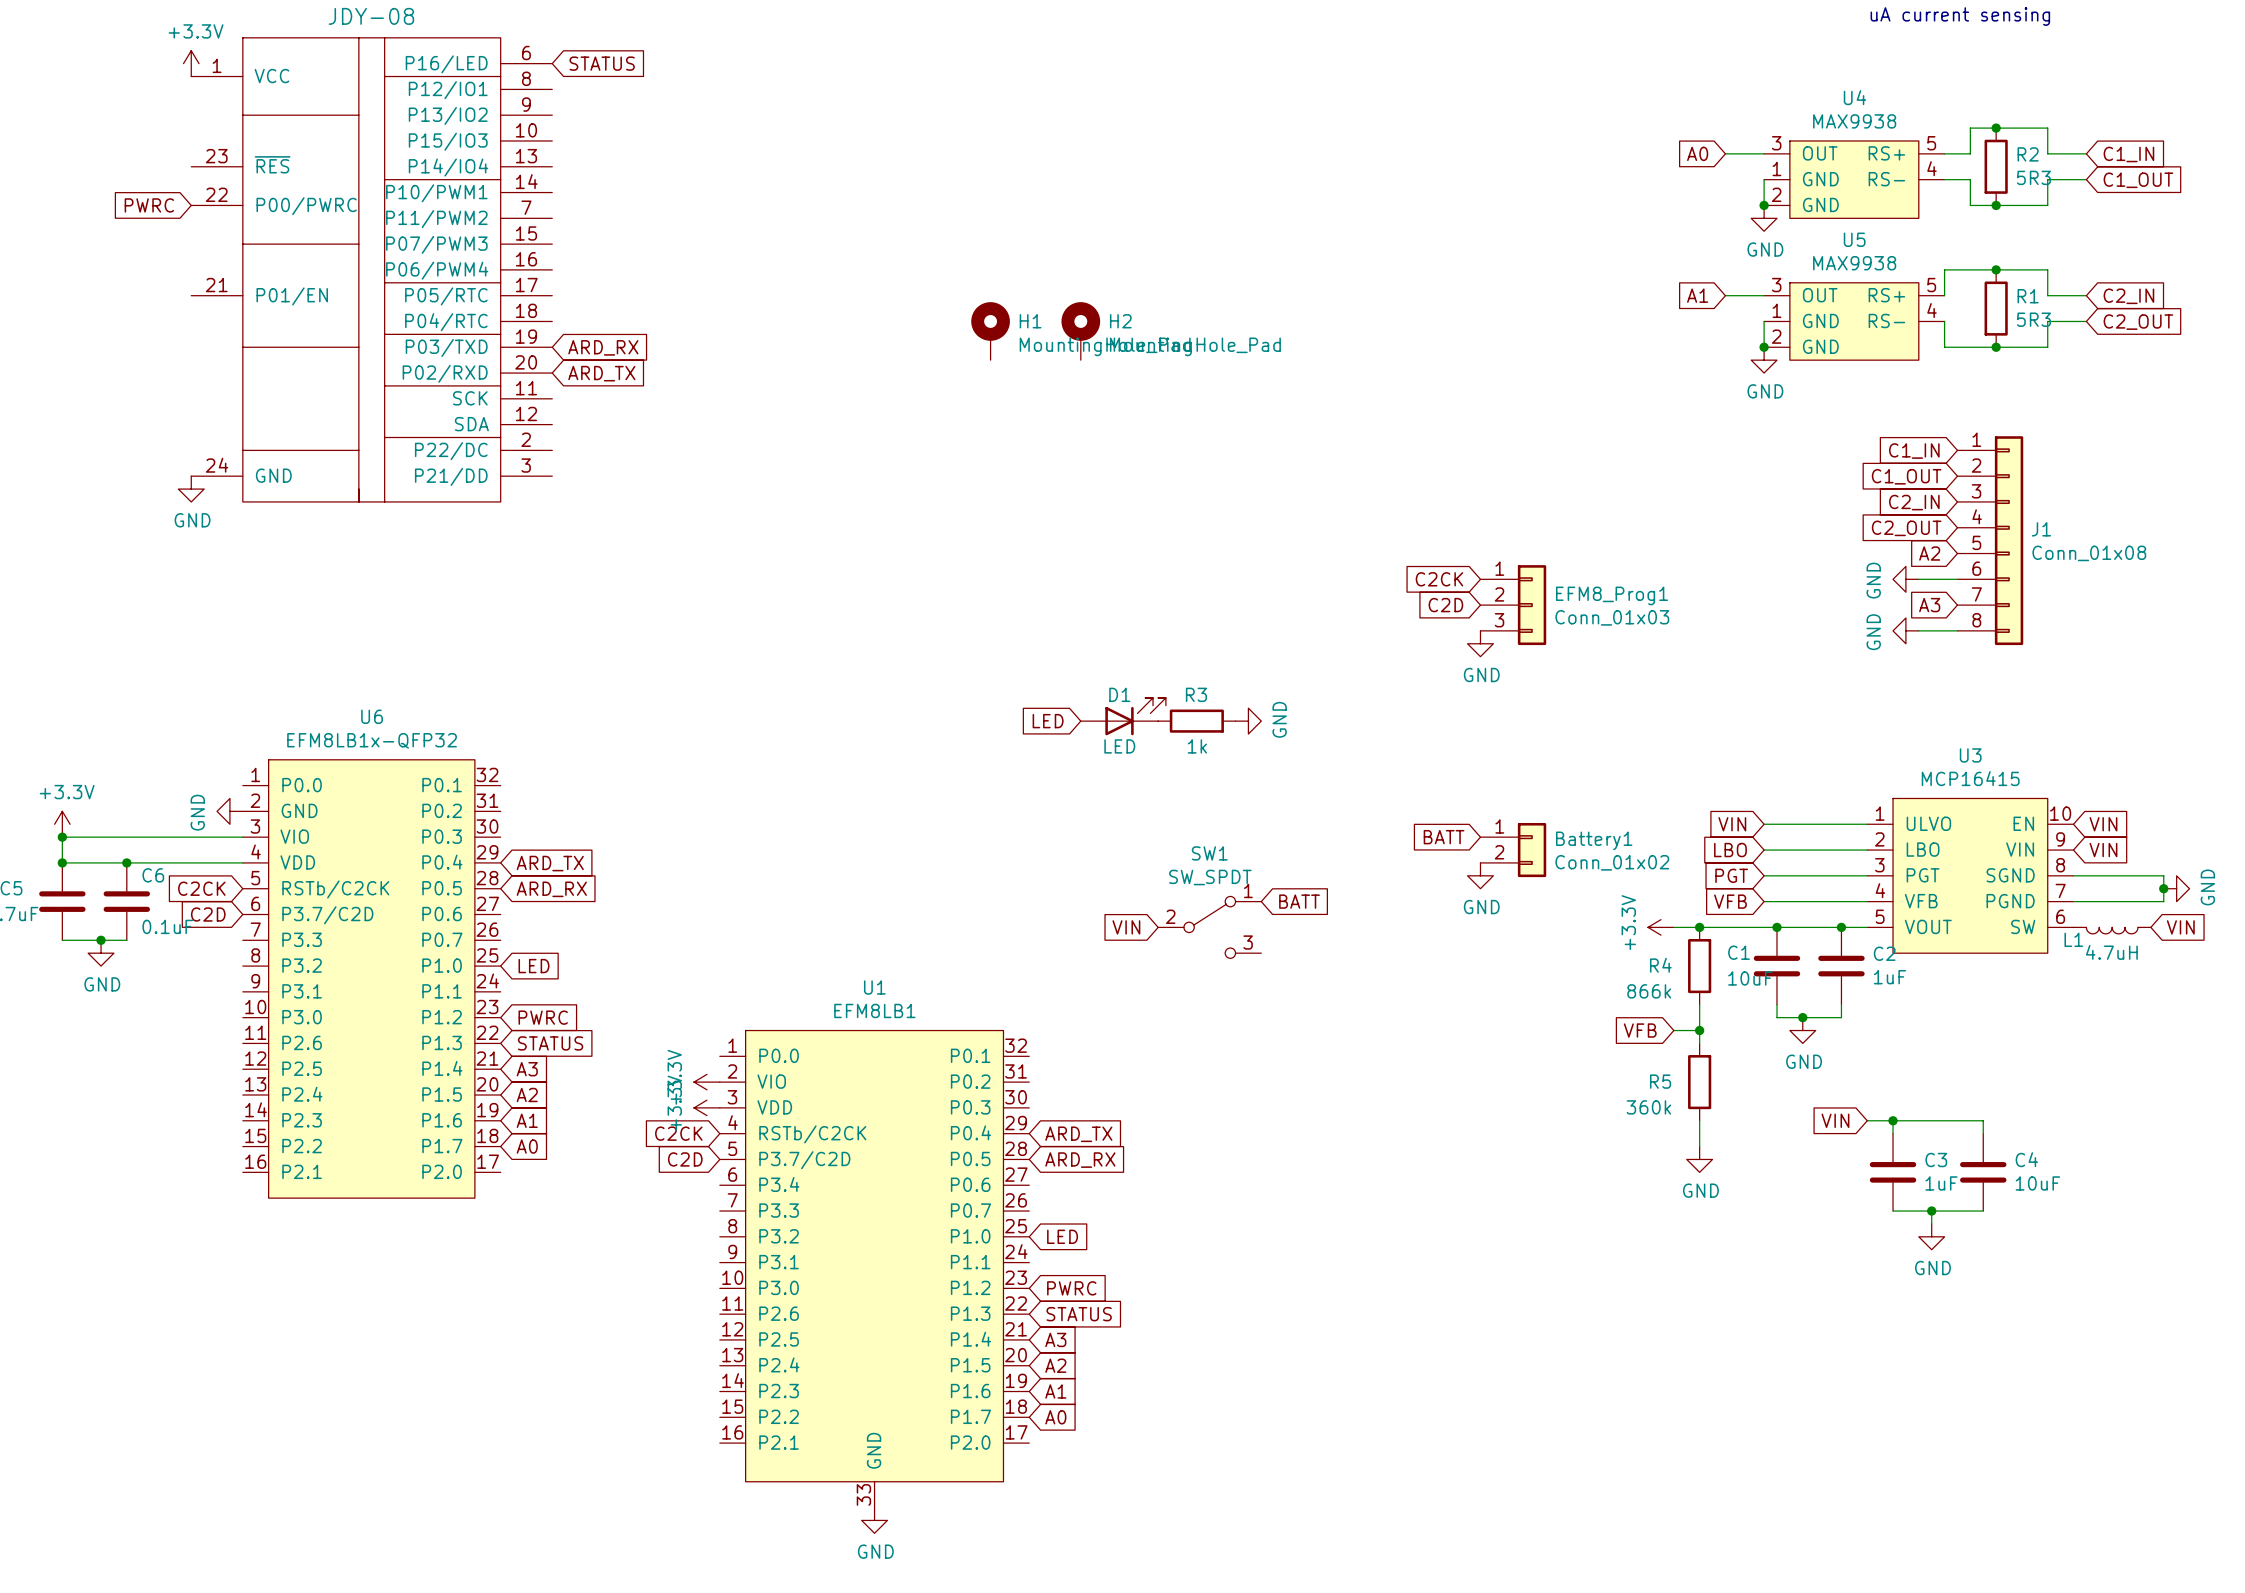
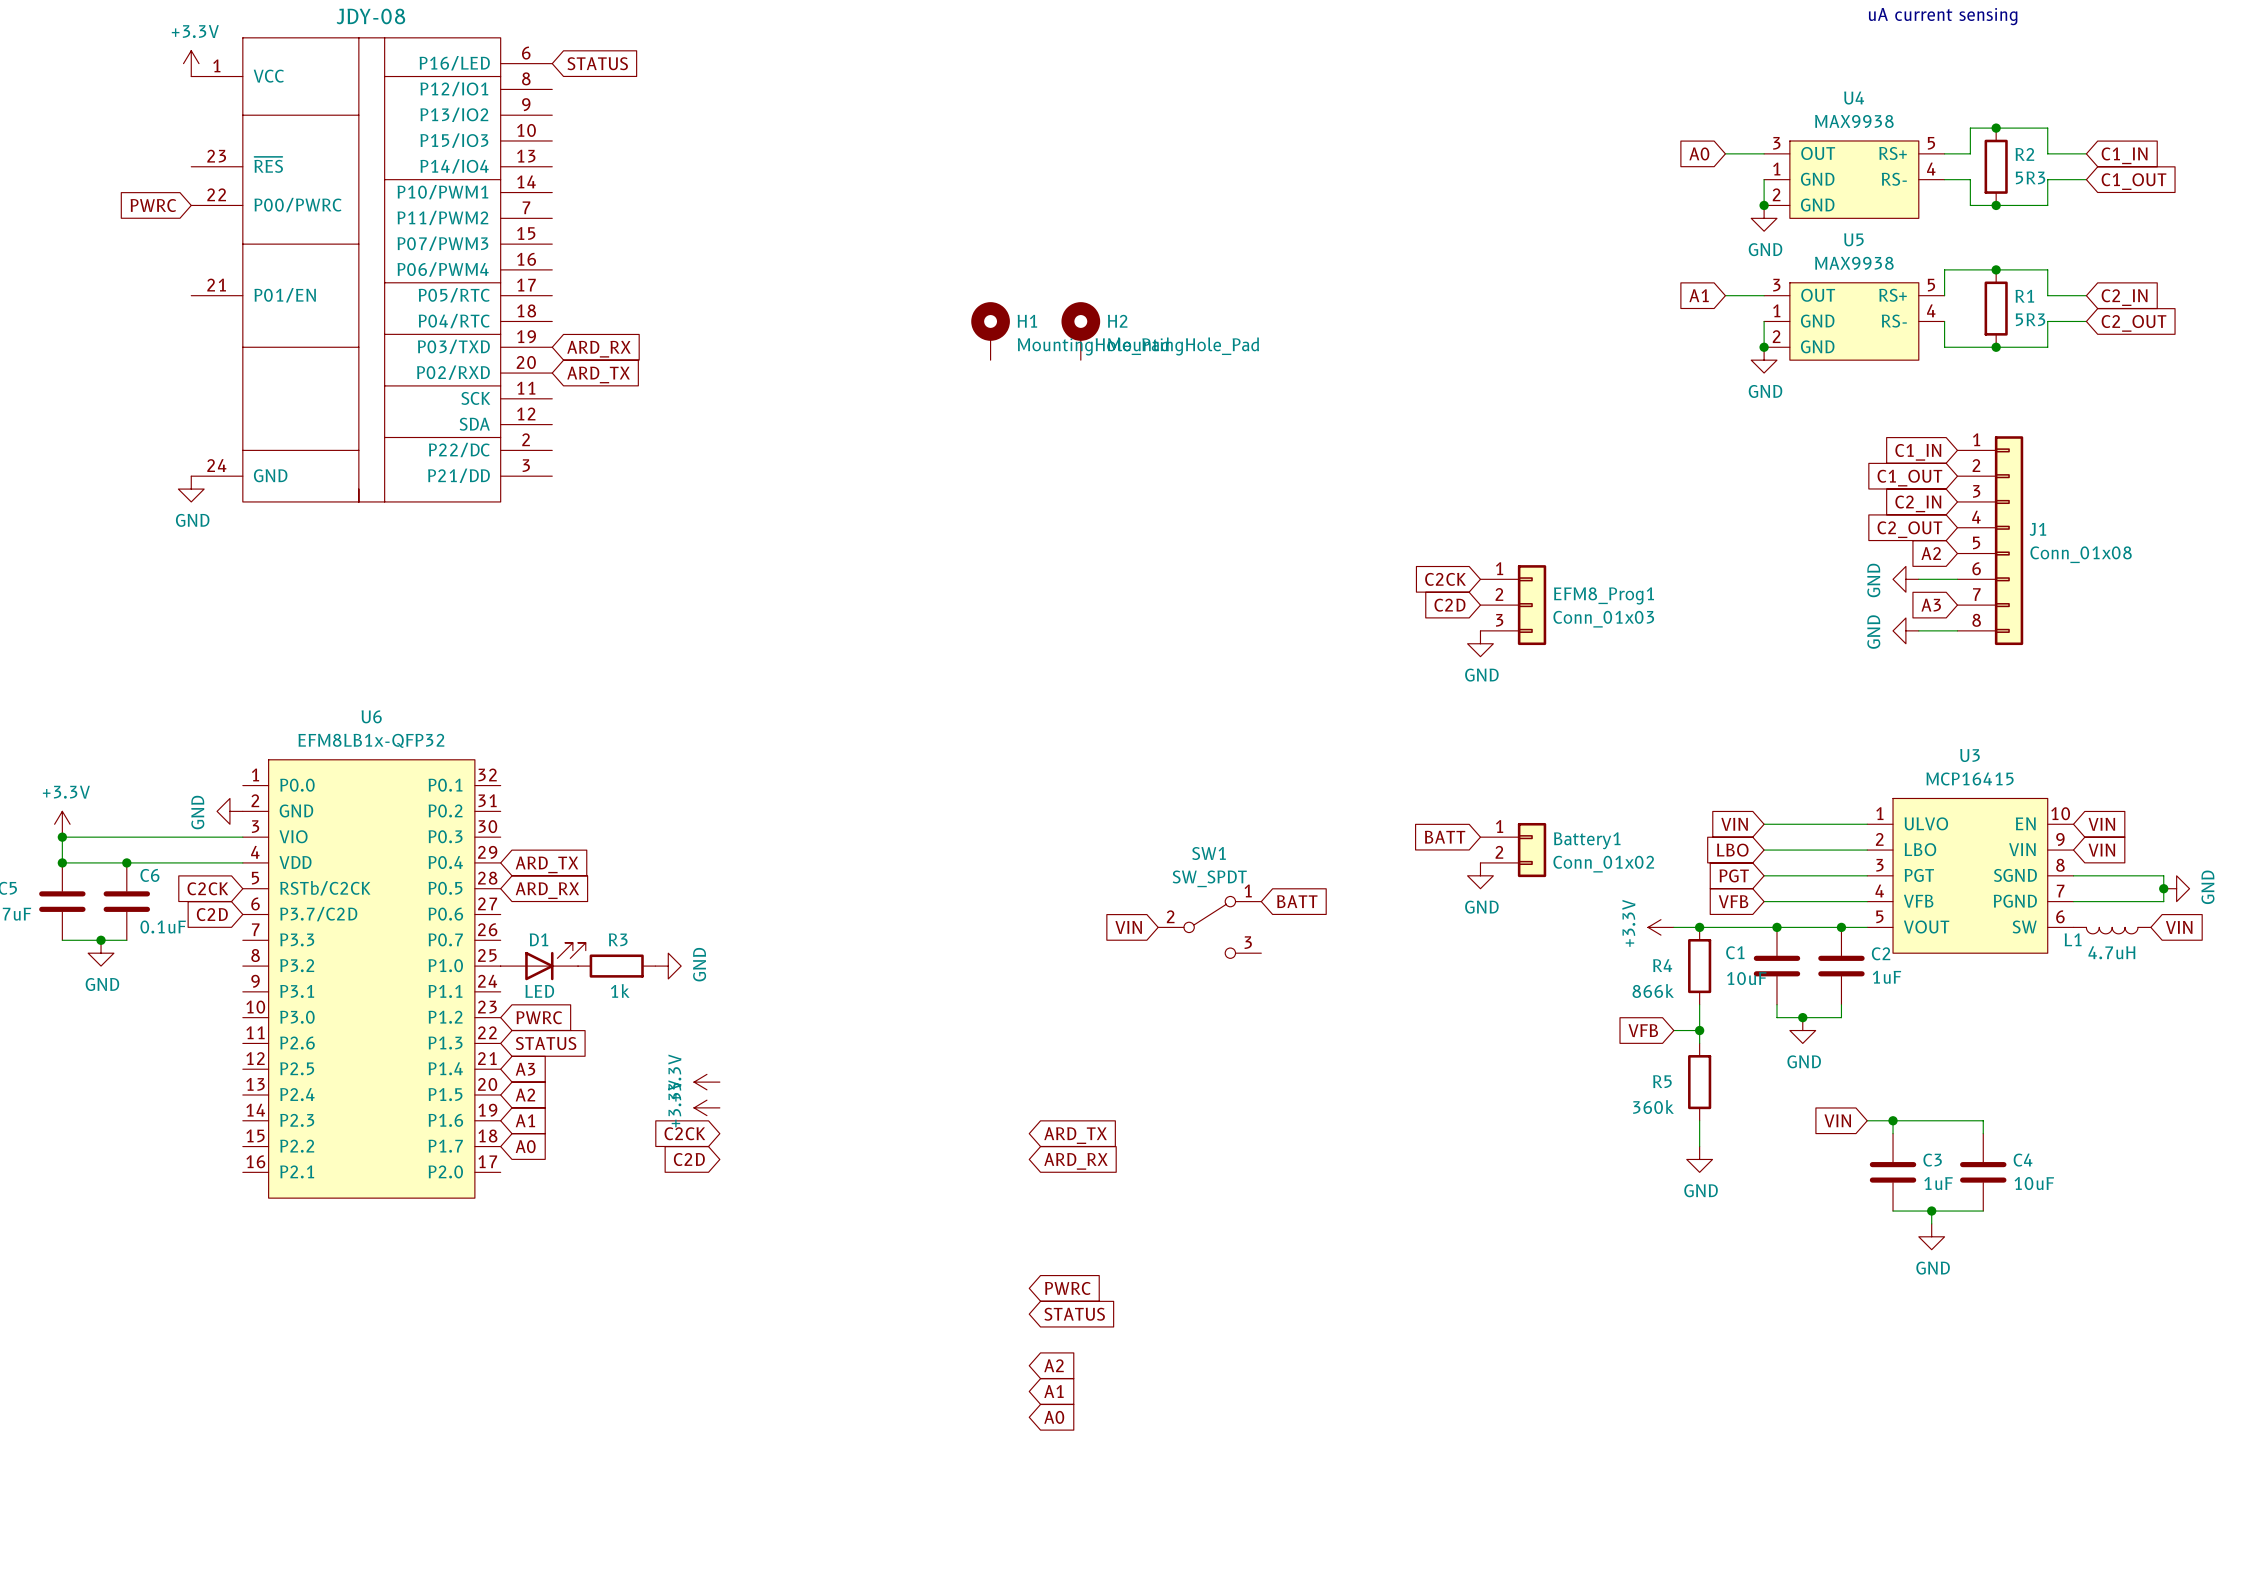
D1 position: (1123, 716) -> (543, 961)
global label: LED (1048, 721) -> none
R3 position: (1196, 721) -> (616, 966)
power symbol: GND (1248, 721) -> none
global label: LED (534, 966) -> none
power symbol: none -> GND (668, 966)
global label: LED (1062, 1236) -> none
U1: EFM8LB1 (874, 1269) -> none
global label: A3 (1055, 1339) -> none
power symbol: GND (874, 1520) -> none

